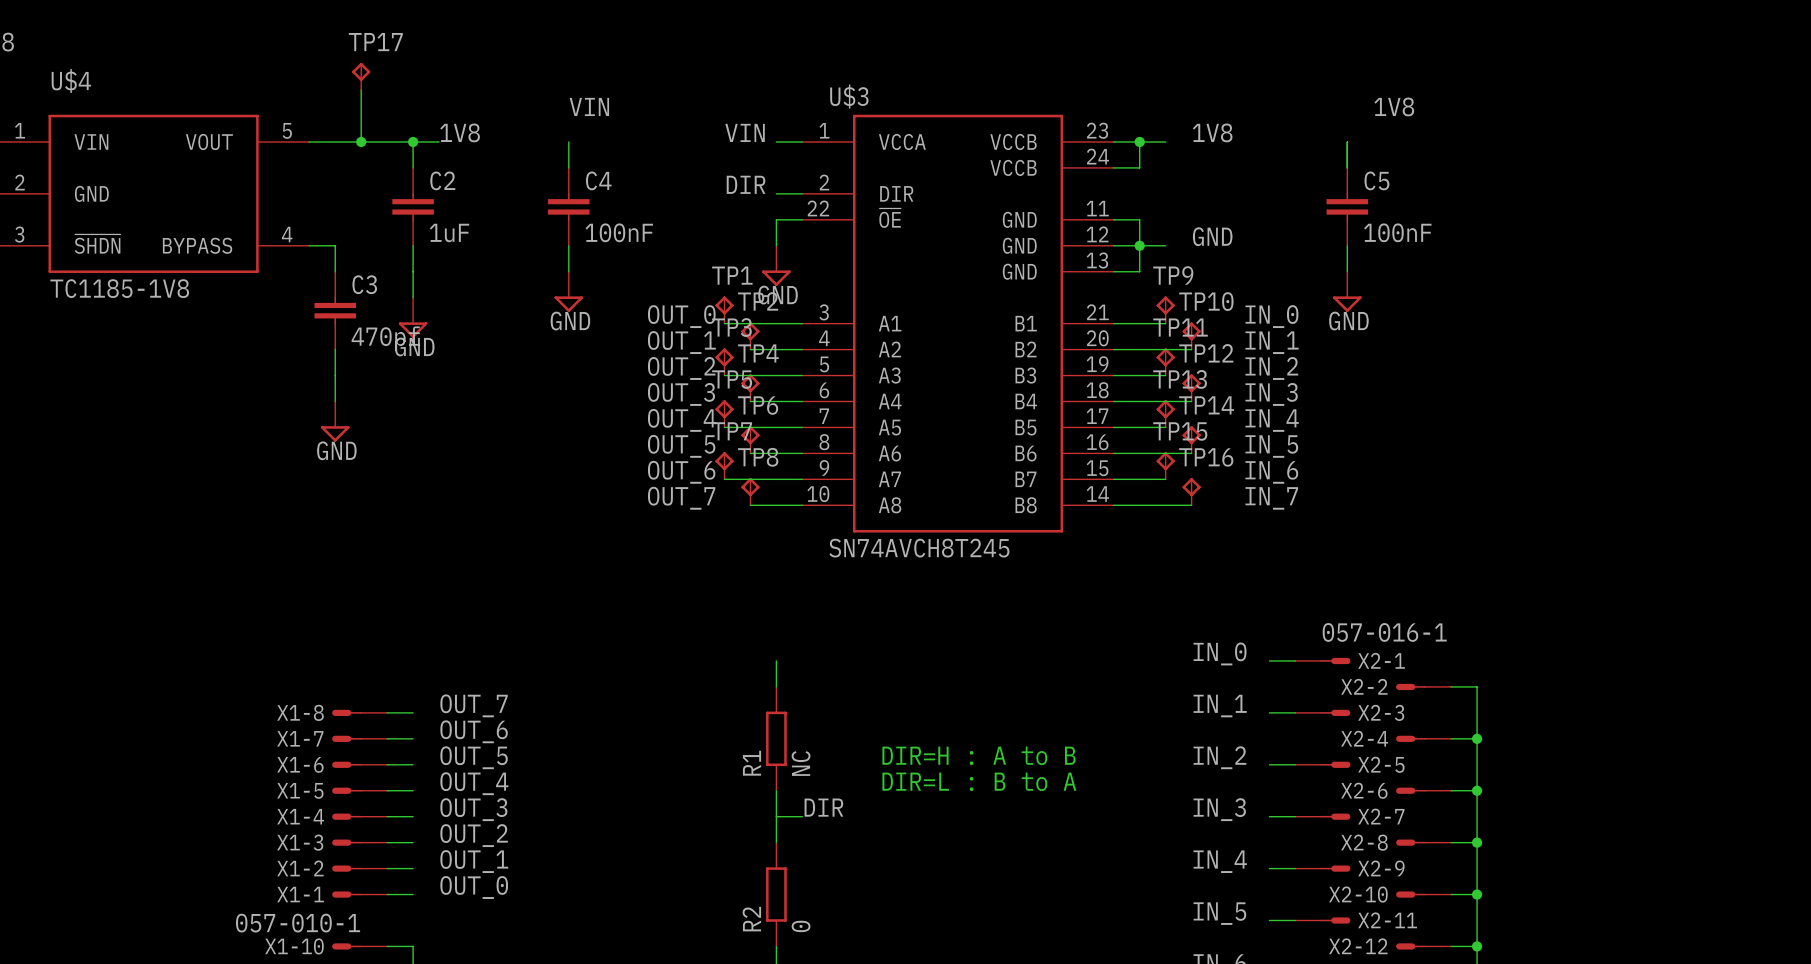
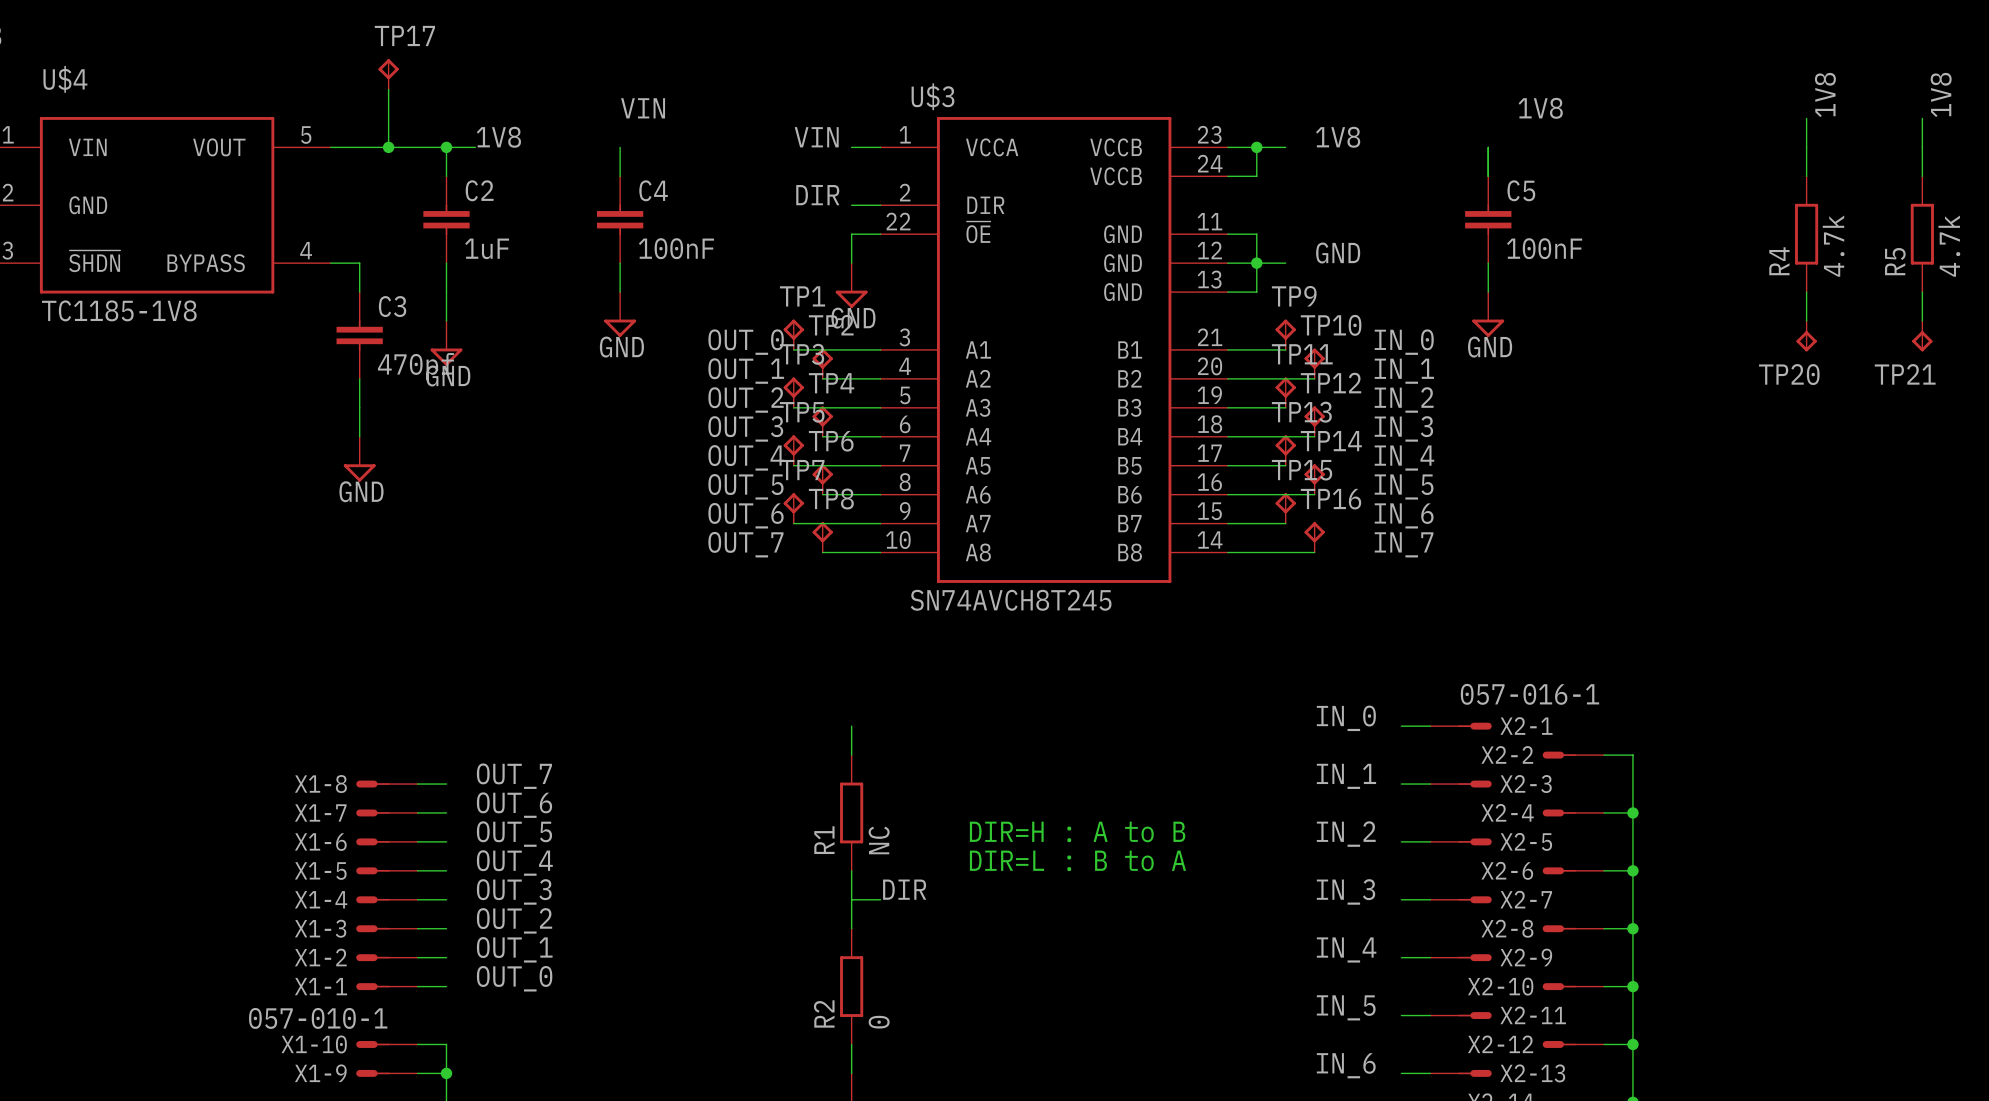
label: none -> 1V8 (1825, 94)
label: none -> 1V8 (1941, 94)
wire: none -> (1806, 118) (1806, 176)
wire: none -> (1922, 118) (1922, 176)
R4: none -> 4.7k (1806, 234)
R5: none -> 4.7k (1922, 234)
wire: none -> (1806, 292) (1806, 321)
wire: none -> (1922, 292) (1922, 321)
TP20: none -> (1806, 336)
TP21: none -> (1922, 336)

